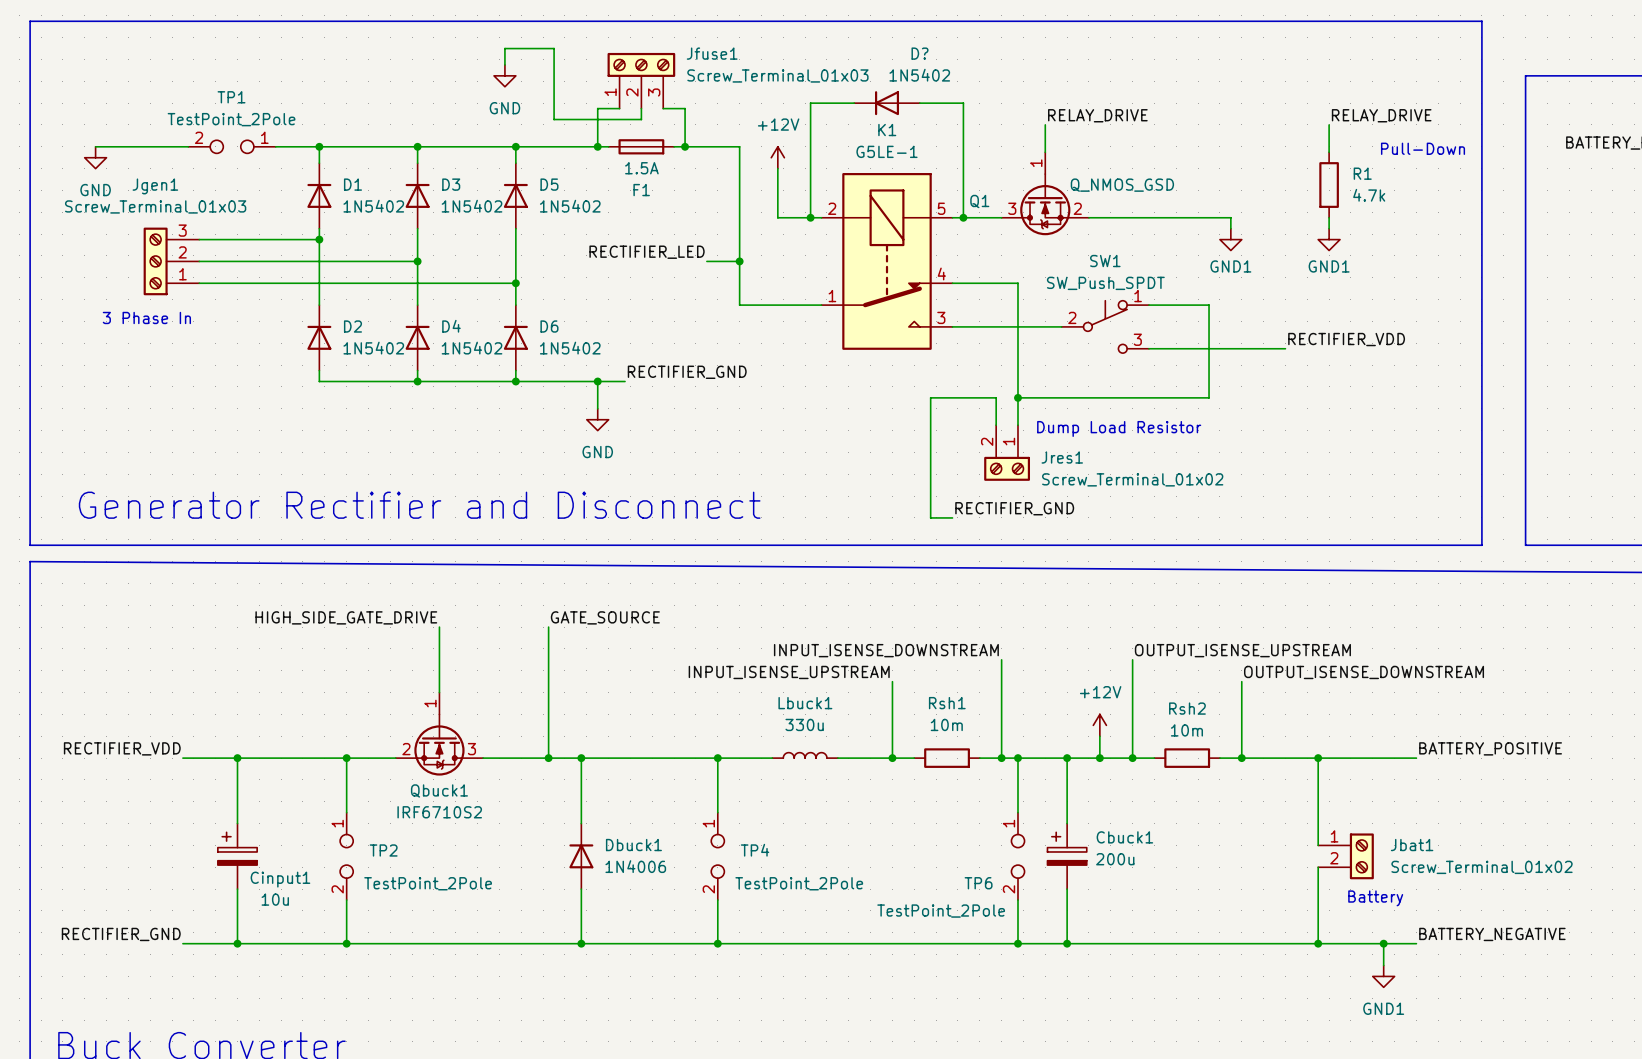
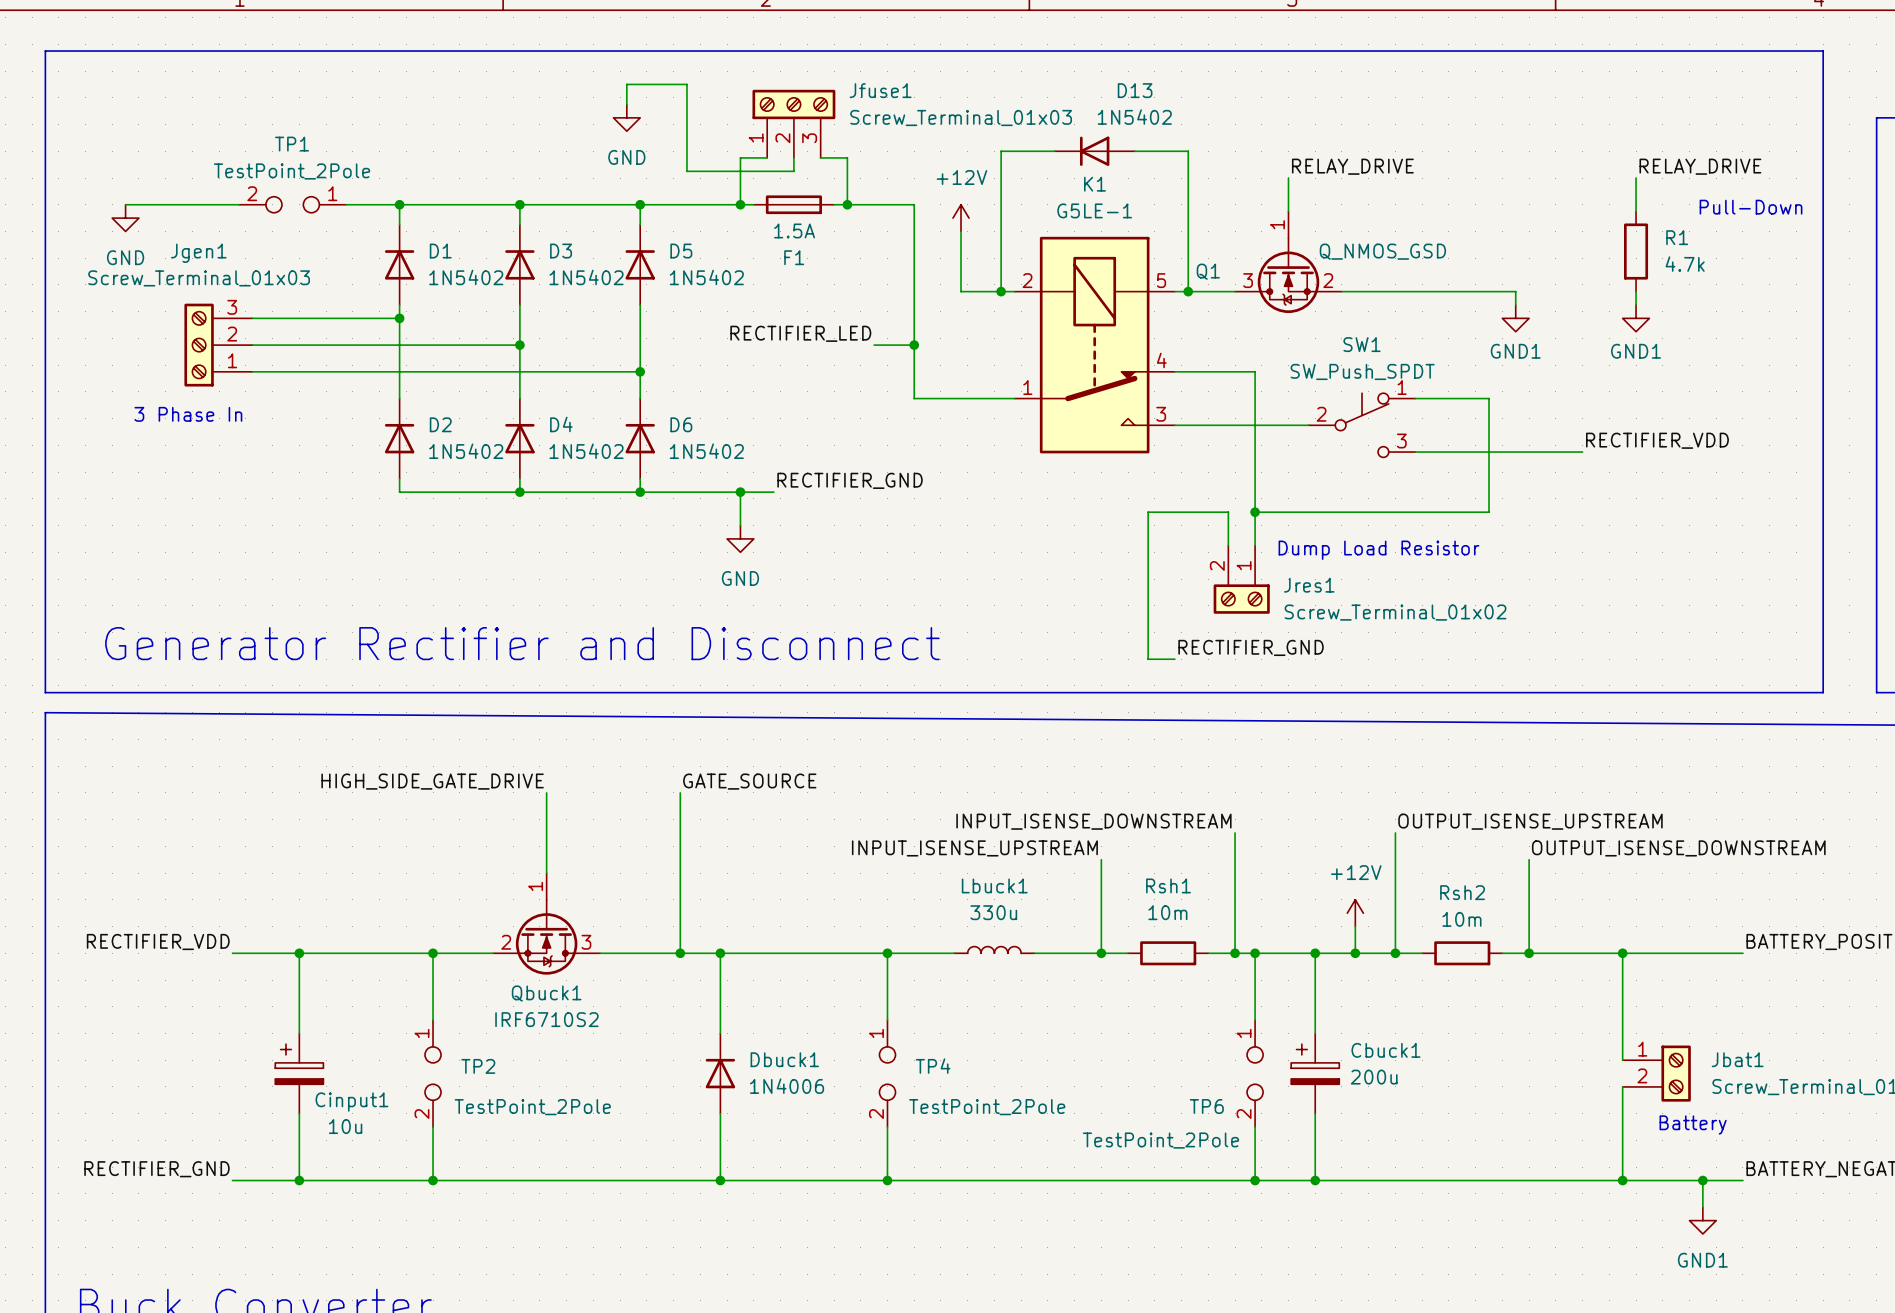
D? name: D? (920, 53) -> D13 (1135, 90)

